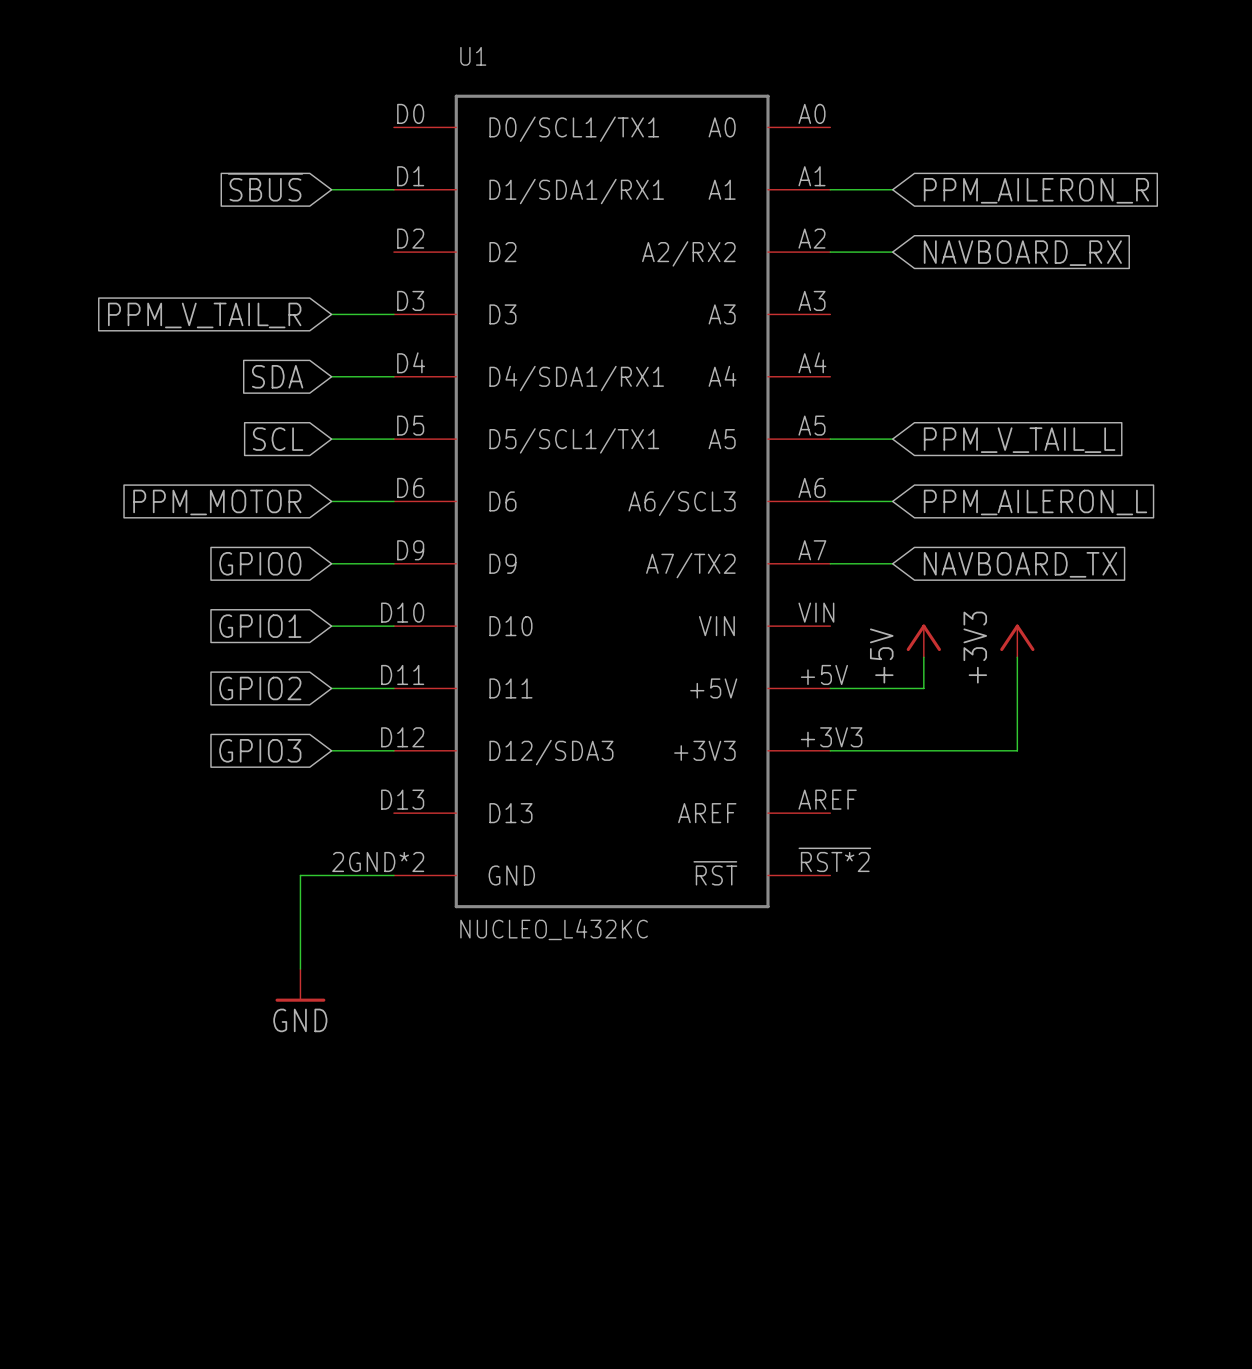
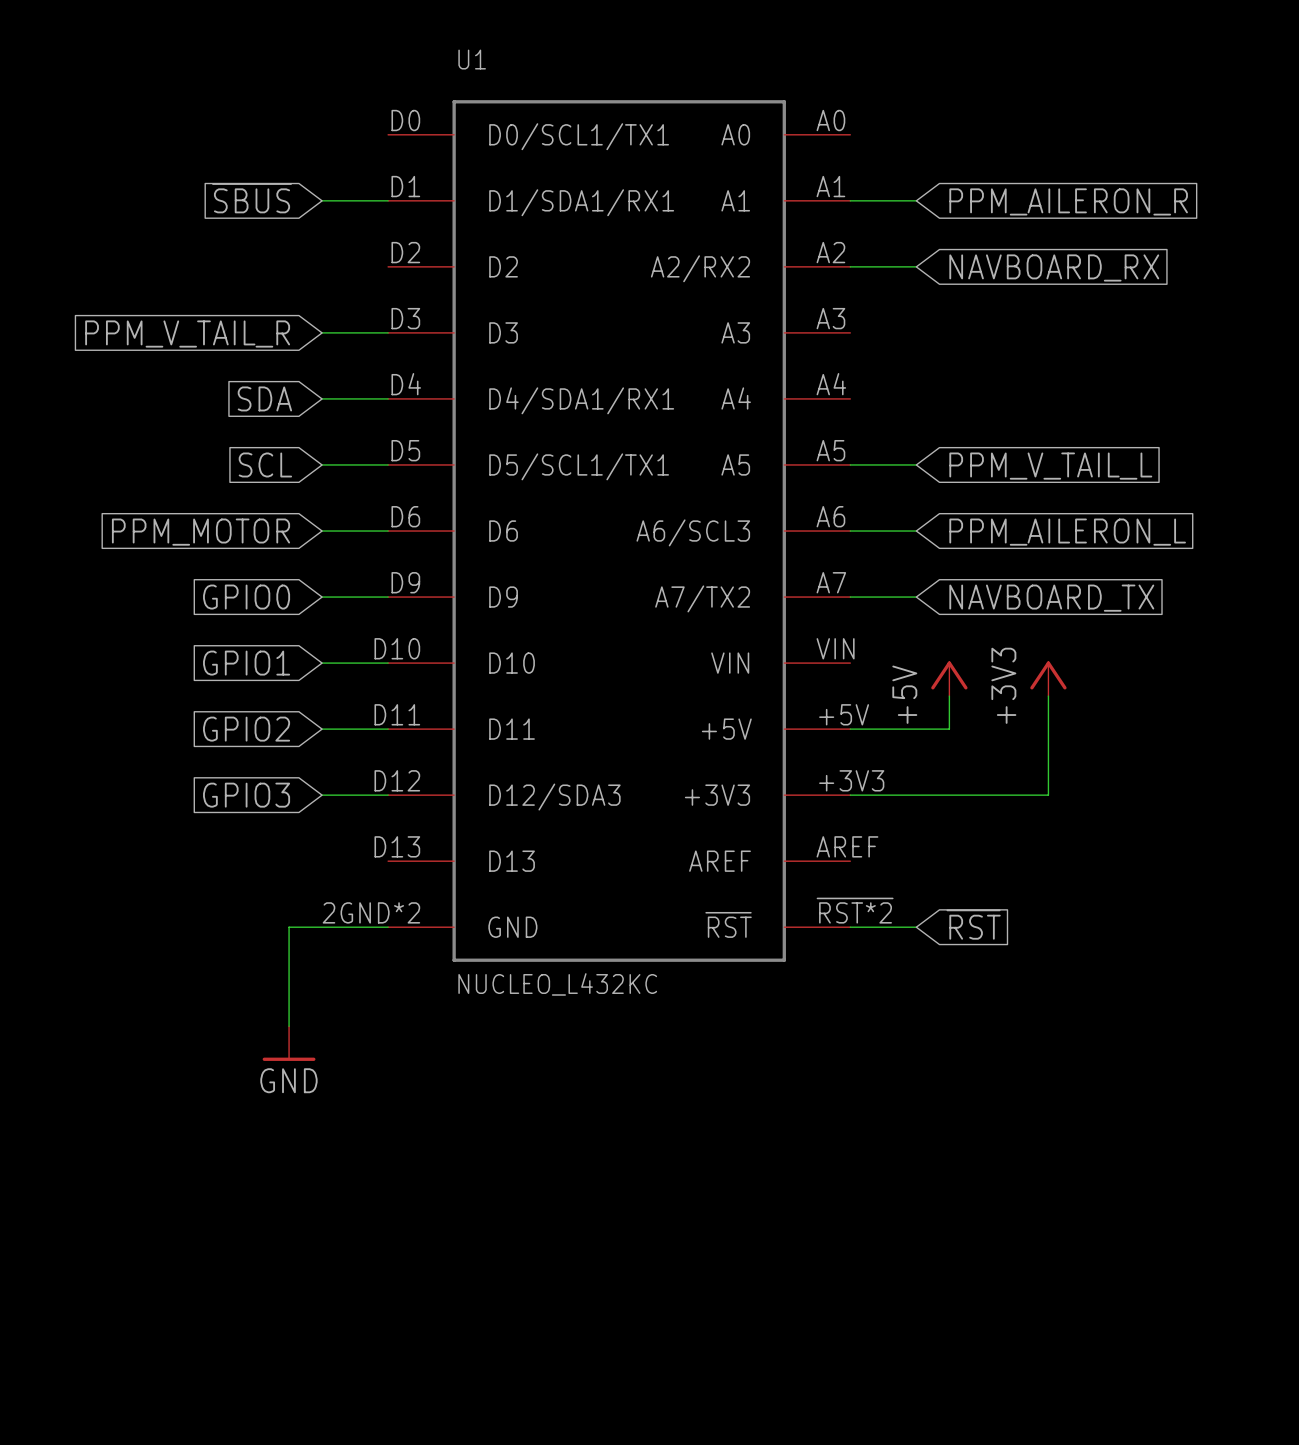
global label: none -> ~{RST} (973, 924)
wire: none -> (850, 927) (916, 927)

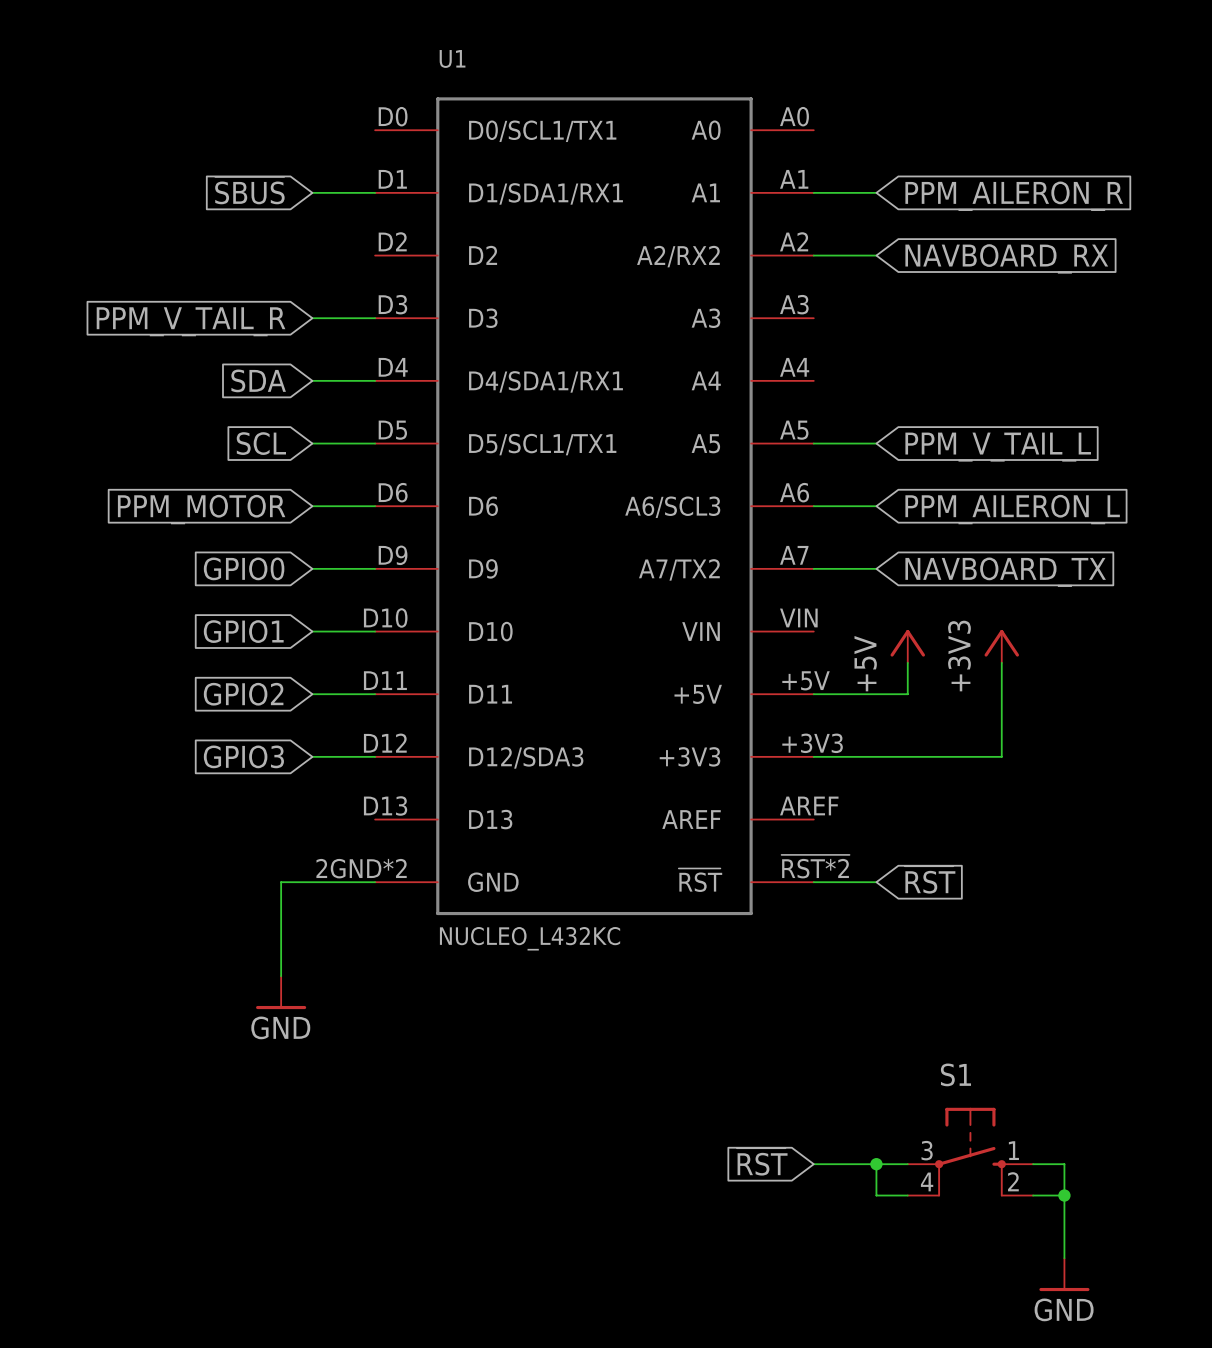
S1: none -> (970, 1152)
global label: none -> ~{RST} (762, 1161)
wire: none -> (813, 1164) (907, 1164)
wire: none -> (876, 1164) (876, 1195) (907, 1195)
junction: none -> (876, 1164)
wire: none -> (1033, 1164) (1064, 1164) (1064, 1258)
wire: none -> (1033, 1195) (1064, 1195)
junction: none -> (1064, 1195)
power symbol: none -> GND (1064, 1274)

